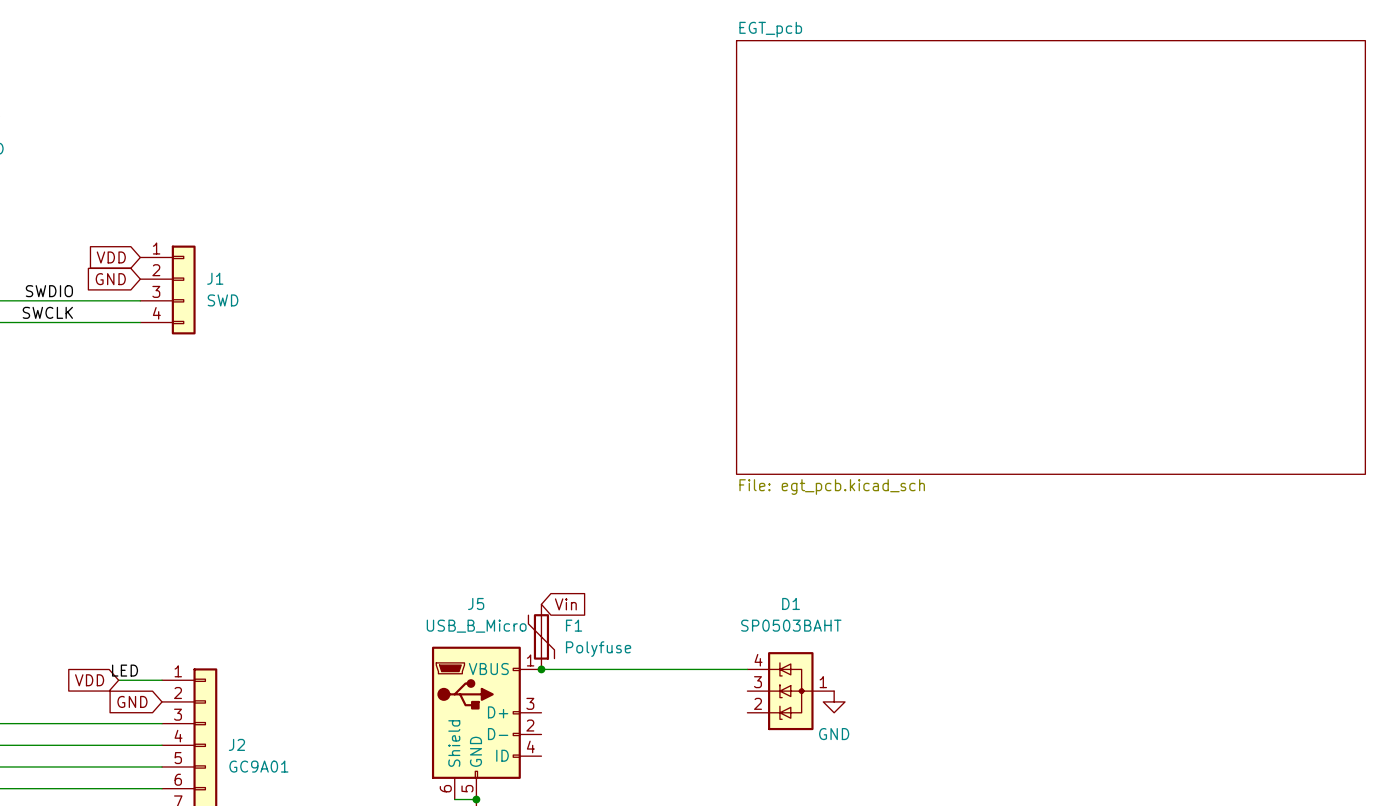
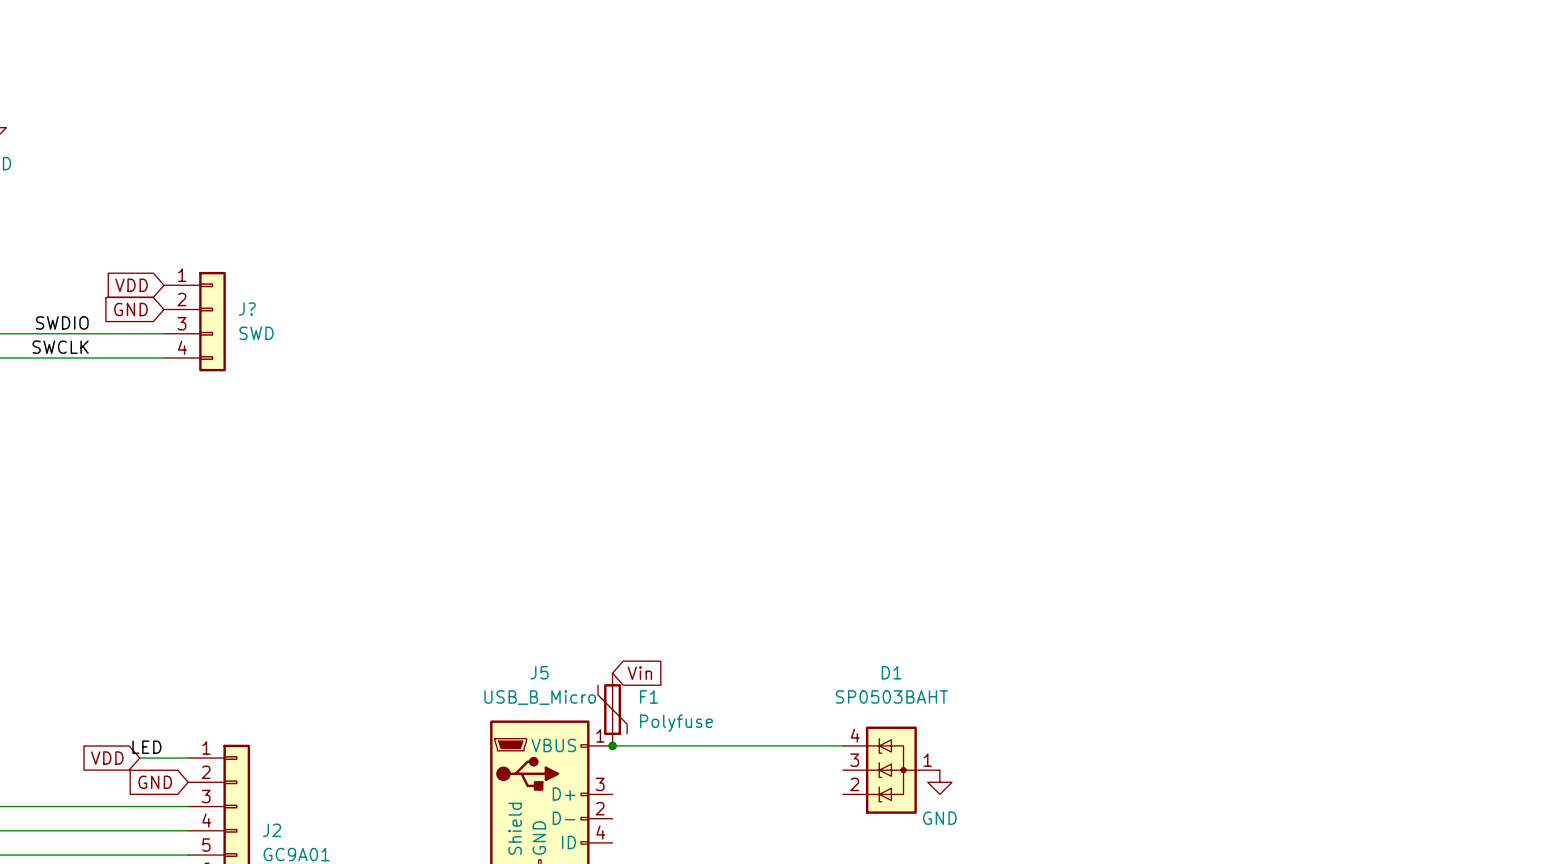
sheet EGT_pcb: File: egt_pcb.kicad_sch (1050, 257) -> none
J1 name: J1 (215, 278) -> J? (247, 309)

